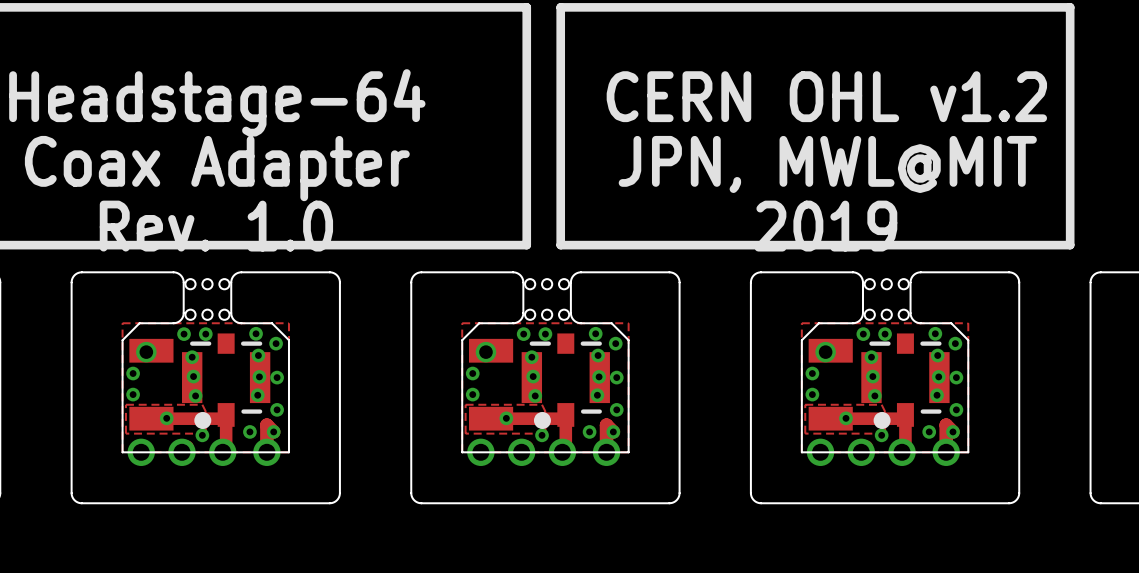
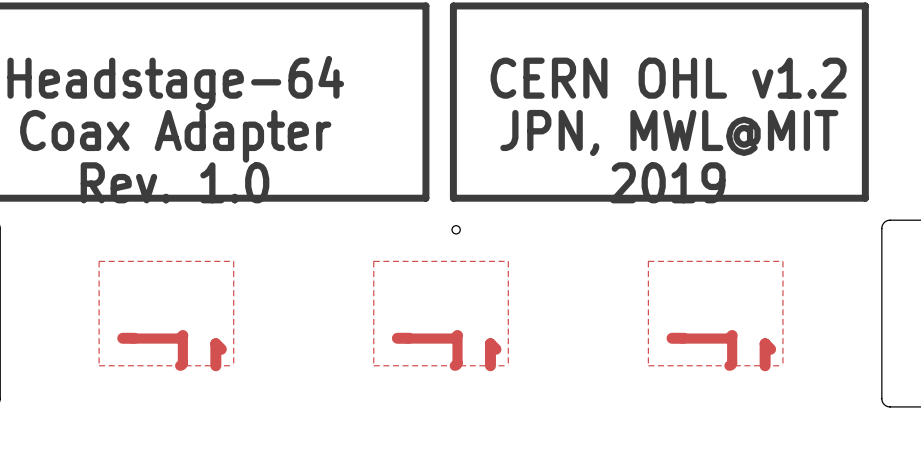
board edge: (81, 272) (174, 272) (179, 274) (183, 279) (183, 313) (180, 320) (174, 323) (139, 323) (122, 340) (122, 452) (288, 452) (288, 340) (272, 323) (240, 323) (234, 320) (231, 313) (231, 279) (235, 274) (241, 272) (329, 272) (336, 275) (339, 282) (339, 493) (336, 500) (329, 503) (81, 503) (74, 500) (71, 493) (71, 282) (74, 275) (81, 272) -> none
board edge: (421, 272) (514, 272) (519, 274) (523, 279) (523, 313) (520, 320) (514, 323) (479, 323) (462, 340) (462, 452) (628, 452) (628, 340) (611, 323) (579, 323) (573, 320) (570, 313) (571, 279) (574, 274) (581, 272) (669, 272) (676, 275) (679, 282) (679, 493) (676, 500) (669, 503) (421, 503) (414, 500) (411, 493) (411, 282) (414, 275) (421, 272) -> none
board edge: (761, 272) (854, 272) (859, 274) (862, 279) (862, 313) (860, 320) (854, 323) (818, 323) (801, 340) (801, 452) (968, 452) (968, 340) (951, 323) (919, 323) (913, 320) (910, 313) (910, 279) (914, 274) (920, 272) (1009, 272) (1016, 275) (1019, 282) (1019, 493) (1016, 500) (1009, 503) (761, 503) (753, 500) (750, 493) (750, 282) (753, 275) (761, 272) -> none
hole: (190, 284) -> none
hole: (207, 284) -> none
hole: (224, 284) -> none
hole: (530, 284) -> none
hole: (547, 284) -> none
hole: (869, 284) -> none
hole: (886, 284) -> none
hole: (903, 284) -> none
hole: (190, 314) -> none
hole: (207, 314) -> none
hole: (224, 314) -> none
hole: (530, 314) -> none
hole: (547, 314) -> none
hole: (564, 314) -> none
hole: (869, 314) -> none
hole: (886, 314) -> none
hole: (903, 314) -> none
via: (256, 333) -> none
via: (595, 333) -> none
via: (935, 333) -> none
via: (184, 334) -> none
via: (205, 334) -> none
via: (523, 334) -> none
via: (545, 334) -> none
via: (863, 334) -> none
via: (885, 334) -> none
via: (276, 343) -> none
via: (615, 343) -> none
via: (955, 343) -> none
via: (146, 352) -> none
via: (485, 352) -> none
via: (825, 352) -> none
via: (258, 355) -> none
via: (598, 355) -> none
via: (937, 355) -> none
via: (192, 357) -> none
via: (531, 357) -> none
via: (871, 357) -> none
via: (133, 373) -> none
via: (472, 373) -> none
via: (812, 373) -> none
via: (193, 376) -> none
via: (259, 376) -> none
via: (533, 376) -> none
via: (599, 376) -> none
via: (872, 376) -> none
via: (938, 376) -> none
via: (277, 377) -> none
via: (616, 377) -> none
via: (956, 377) -> none
part: (226, 381) -> none
part: (565, 381) -> none
part: (905, 381) -> none
part: (151, 384) -> none
part: (491, 384) -> none
part: (830, 384) -> none
via: (133, 394) -> none
via: (472, 394) -> none
via: (812, 394) -> none
via: (195, 395) -> none
via: (257, 395) -> none
via: (535, 395) -> none
via: (597, 395) -> none
via: (874, 395) -> none
via: (937, 395) -> none
zone outline: (125, 404) (202, 404) (205, 411) (205, 433) (125, 433) (125, 404) -> none
zone outline: (465, 404) (542, 404) (545, 411) (545, 433) (465, 433) (465, 404) -> none
zone outline: (805, 404) (881, 404) (885, 411) (885, 433) (805, 433) (805, 404) -> none
via: (277, 409) -> none
via: (616, 409) -> none
via: (956, 409) -> none
via: (166, 418) -> none
via: (506, 418) -> none
via: (846, 418) -> none
via: (249, 431) -> none
via: (273, 431) -> none
via: (589, 431) -> none
via: (613, 431) -> none
via: (929, 431) -> none
via: (953, 431) -> none
via: (202, 435) -> none
via: (542, 435) -> none
via: (881, 435) -> none
part: (204, 452) -> none
part: (543, 452) -> none
part: (883, 452) -> none

